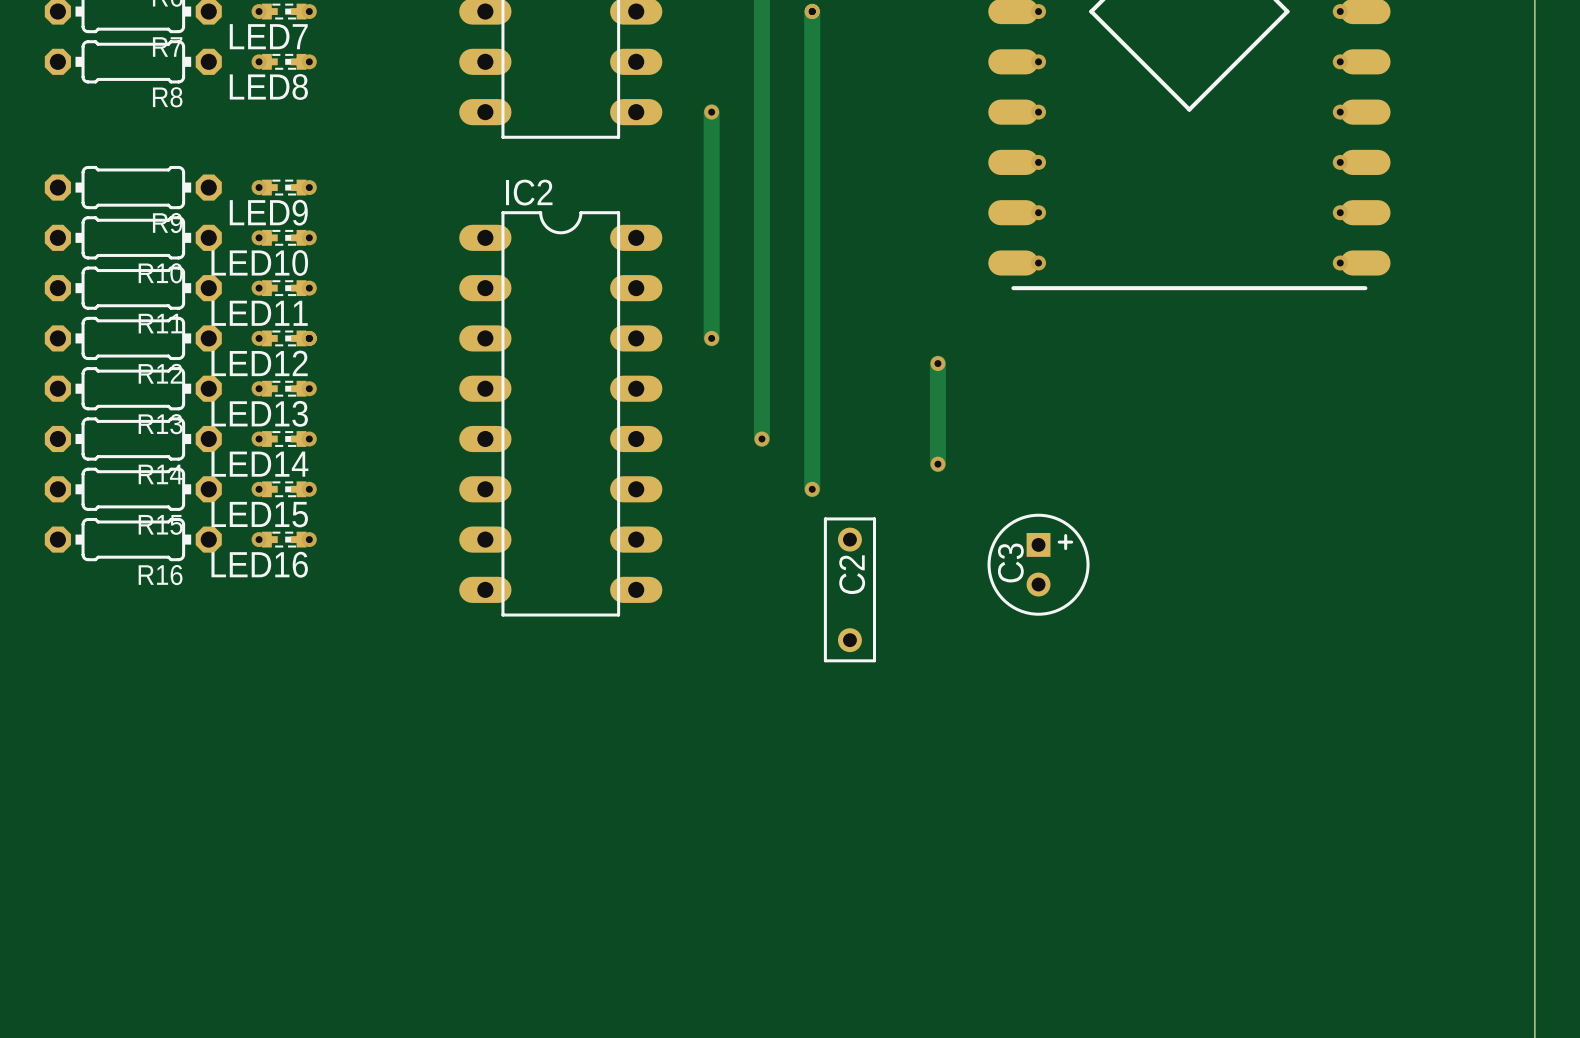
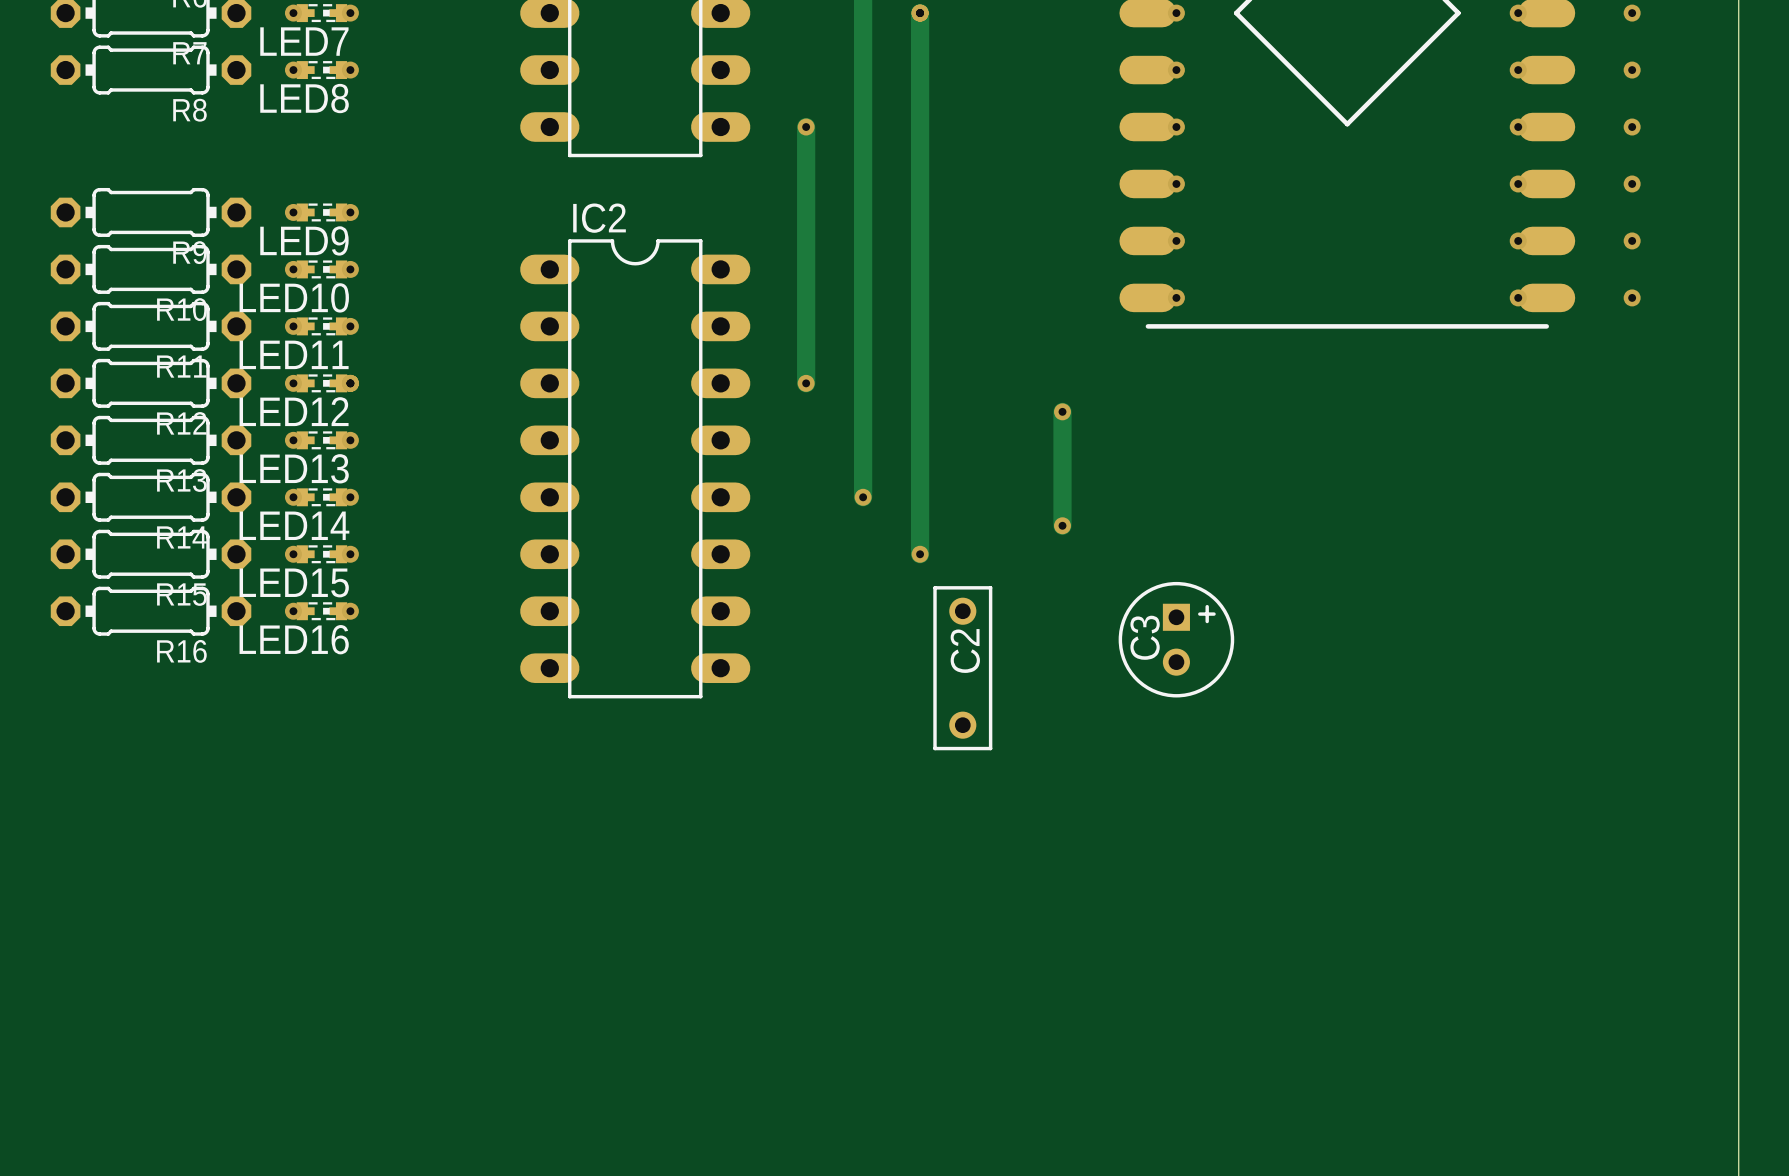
via: none -> (1632, 13)
via: none -> (1632, 70)
via: none -> (1632, 127)
via: none -> (1632, 183)
via: none -> (1632, 240)
via: none -> (1632, 297)

